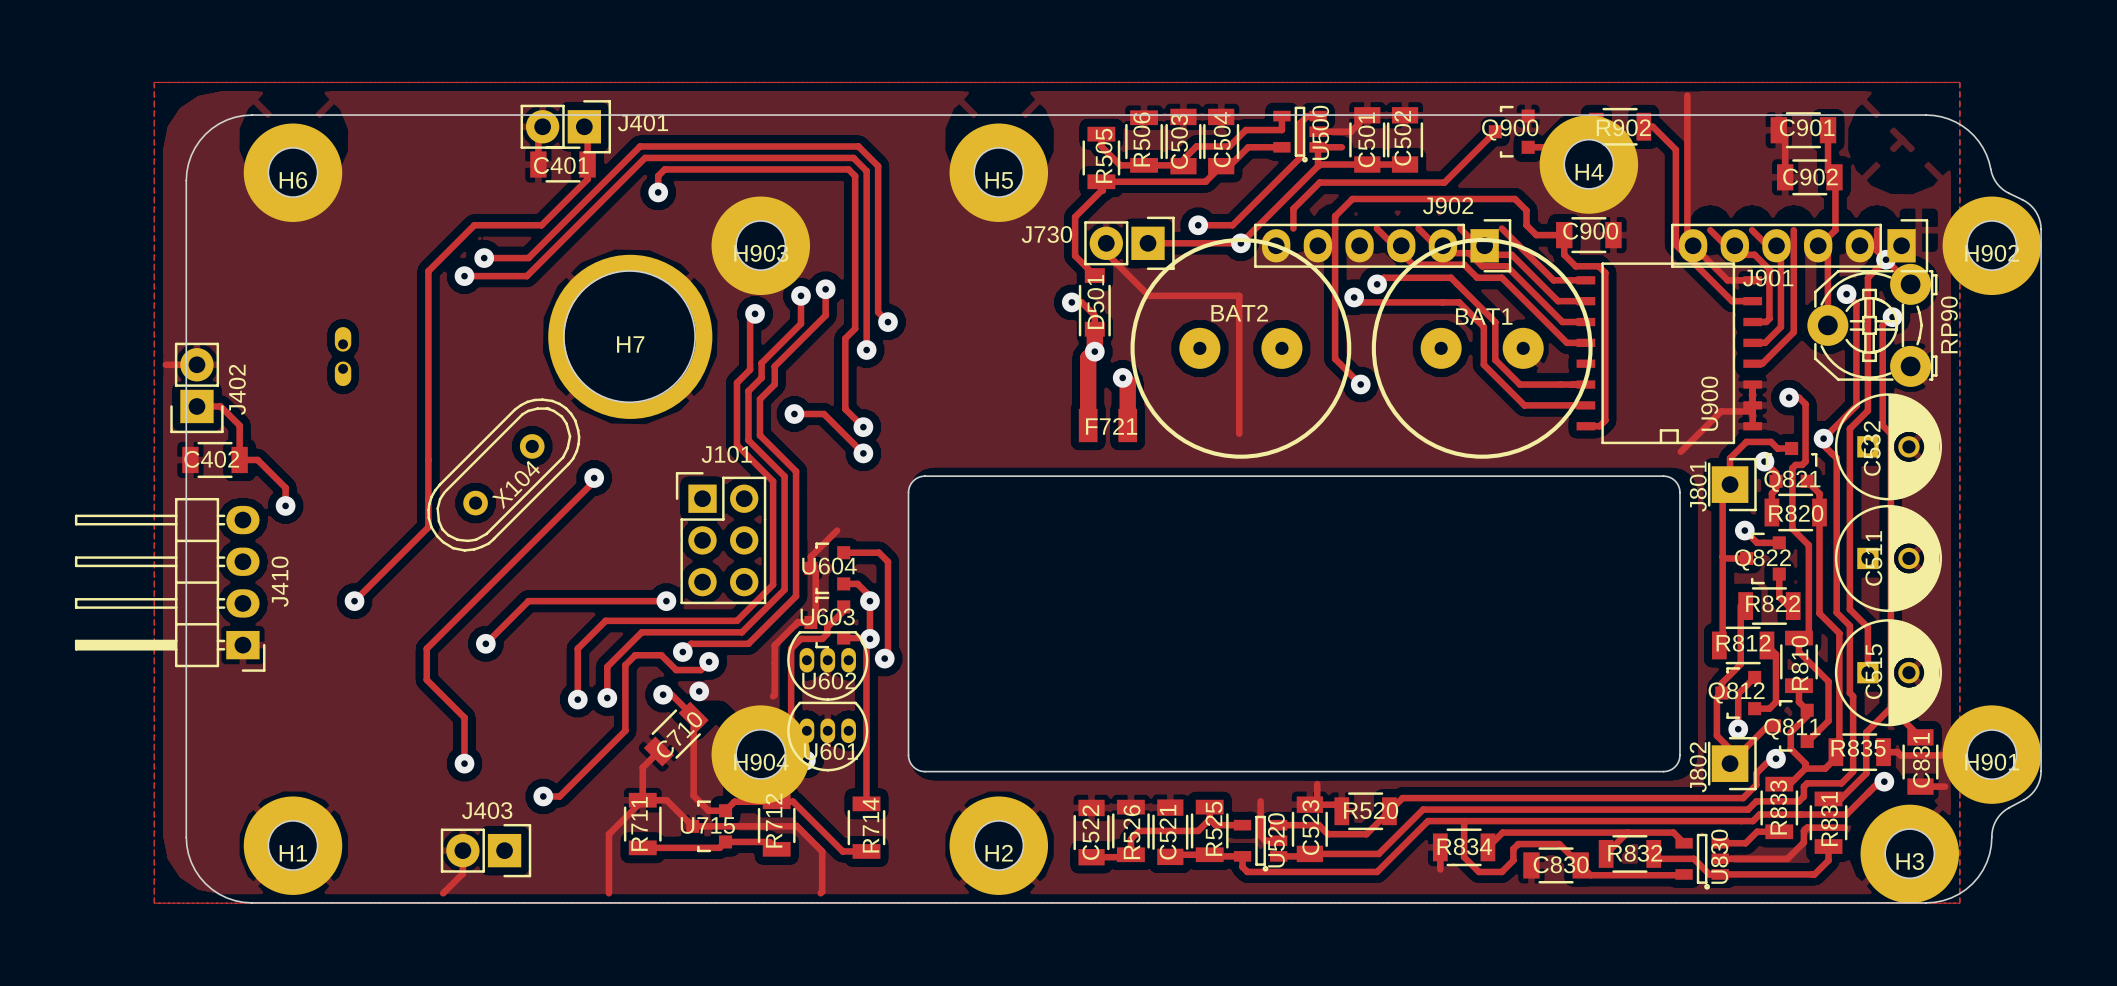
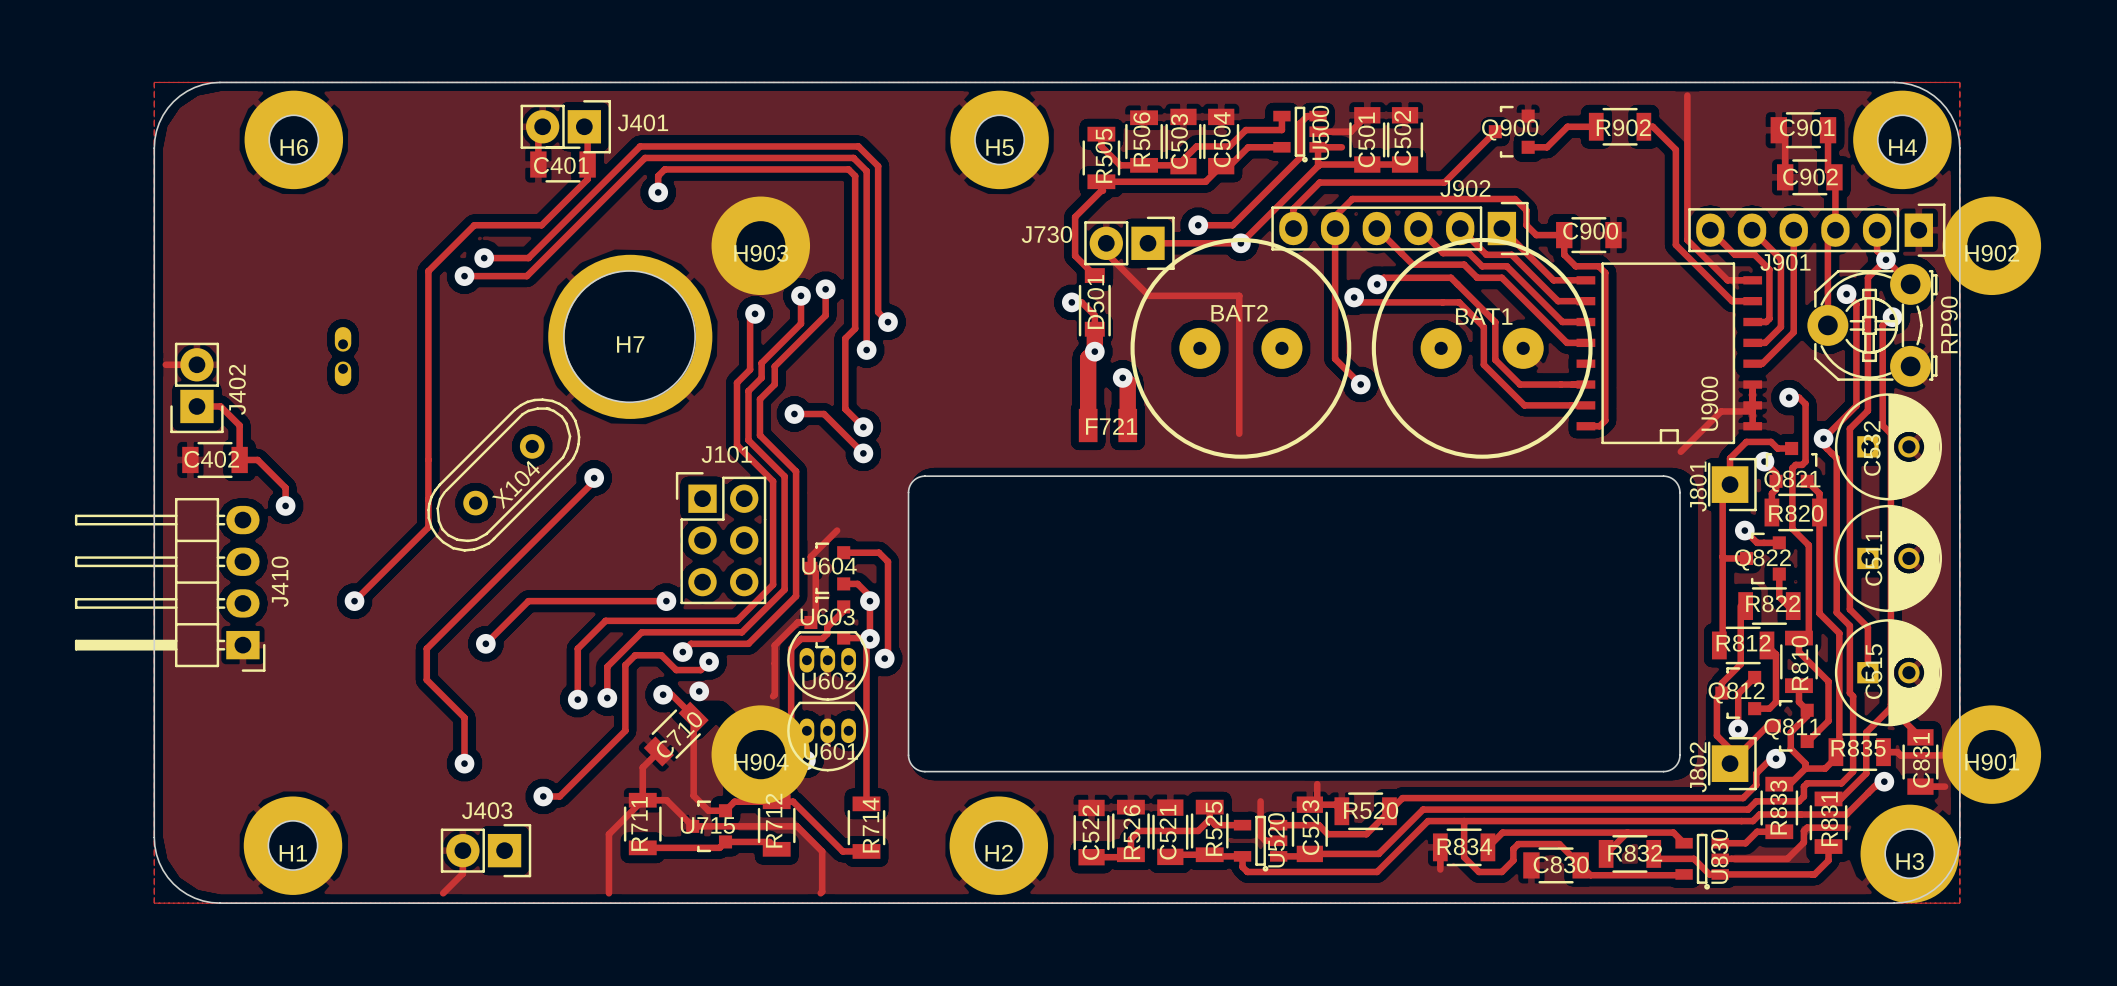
board edge: none -> (219, 82) (1894, 82) (1919, 87) (1934, 96) (1951, 115) (1957, 131) (1959, 148) (1959, 837) (1954, 862) (1946, 877) (1934, 889) (1911, 900) (1894, 903) (219, 903) (194, 898) (179, 889) (167, 877) (156, 854) (154, 837) (154, 148) (159, 122) (173, 101) (194, 87) (219, 82)
round board edge: [1563, 138, 1615, 190] -> none
H4 position: (1588, 164) -> (1902, 139)
board edge: (1990, 169) (1983, 147) (1968, 130) (1948, 118) (1926, 115) (251, 115) (226, 120) (211, 128) (199, 140) (188, 163) (186, 180) (186, 837) (191, 862) (205, 883) (226, 897) (251, 902) (1926, 902) (1951, 897) (1972, 883) (1986, 862) (1991, 837) -> none
board edge: (1990, 169) (1994, 180) (2002, 189) (2025, 201) (2033, 208) (2039, 218) (2041, 229) -> none
H6 position: (292, 172) -> (293, 139)
round board edge position: (292, 172) -> (293, 139)
H5 position: (998, 172) -> (999, 139)
round board edge position: (998, 172) -> (999, 139)
round board edge: [735, 220, 787, 271] -> none
board edge: (2041, 229) (2041, 770) -> none
J902 position: (1382, 245) -> (1399, 228)
J901 position: (1799, 245) -> (1816, 230)
round board edge position: (1991, 245) -> (1902, 139)
round board edge: [735, 728, 787, 780] -> none
round board edge: [1966, 729, 2018, 781] -> none
board edge: (2041, 771) (2039, 781) (2034, 790) (2026, 798) (2000, 814) (1994, 822) (1991, 836) -> none

